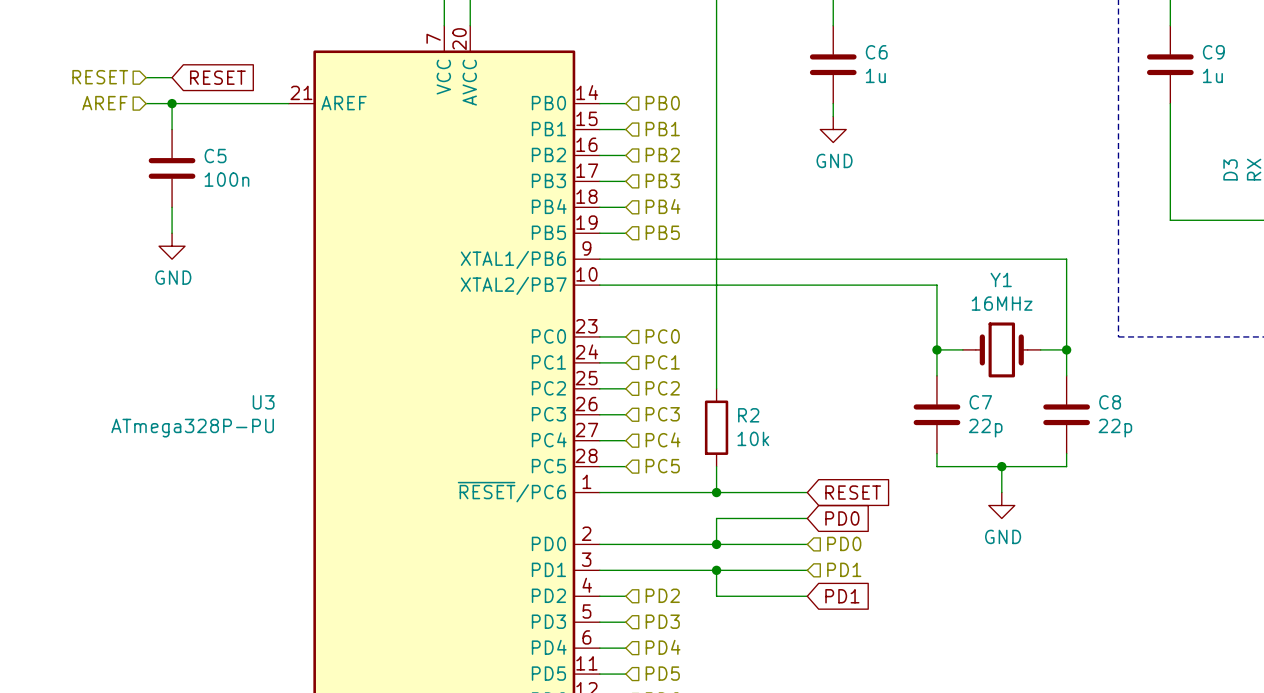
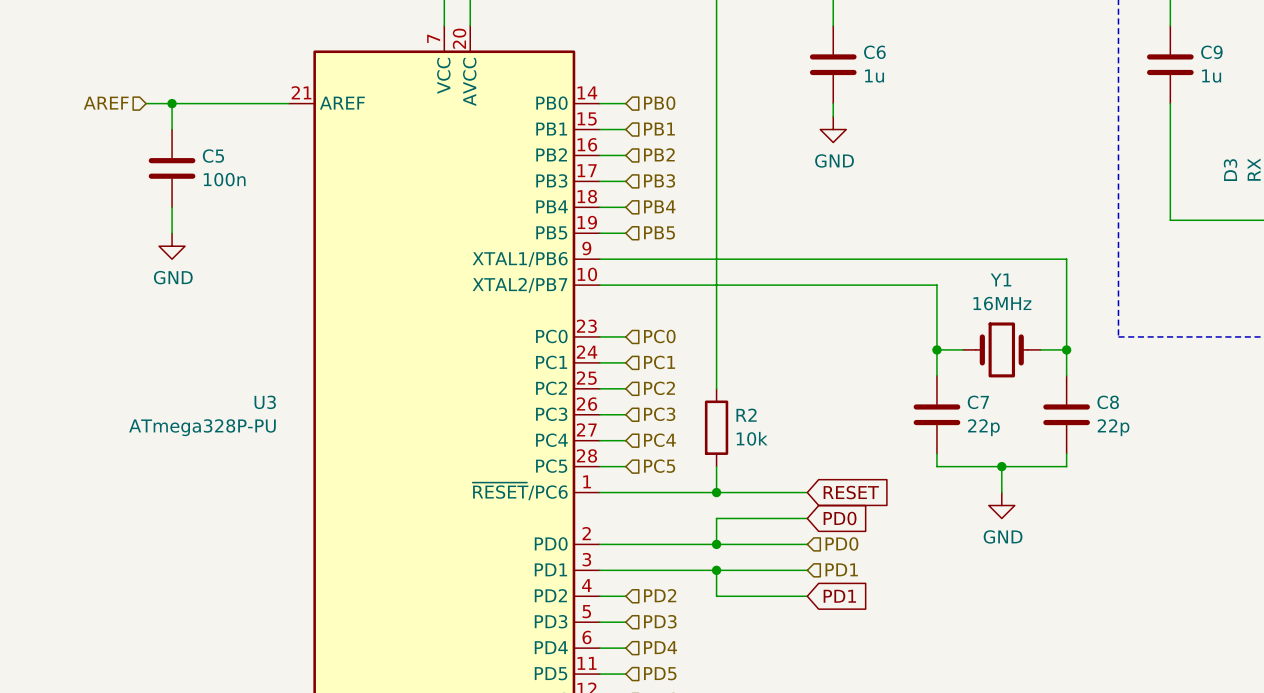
hierarchical label: RESET (100, 77) -> none
wire: (146, 77) (172, 77) -> none
global label: RESET (217, 77) -> none

